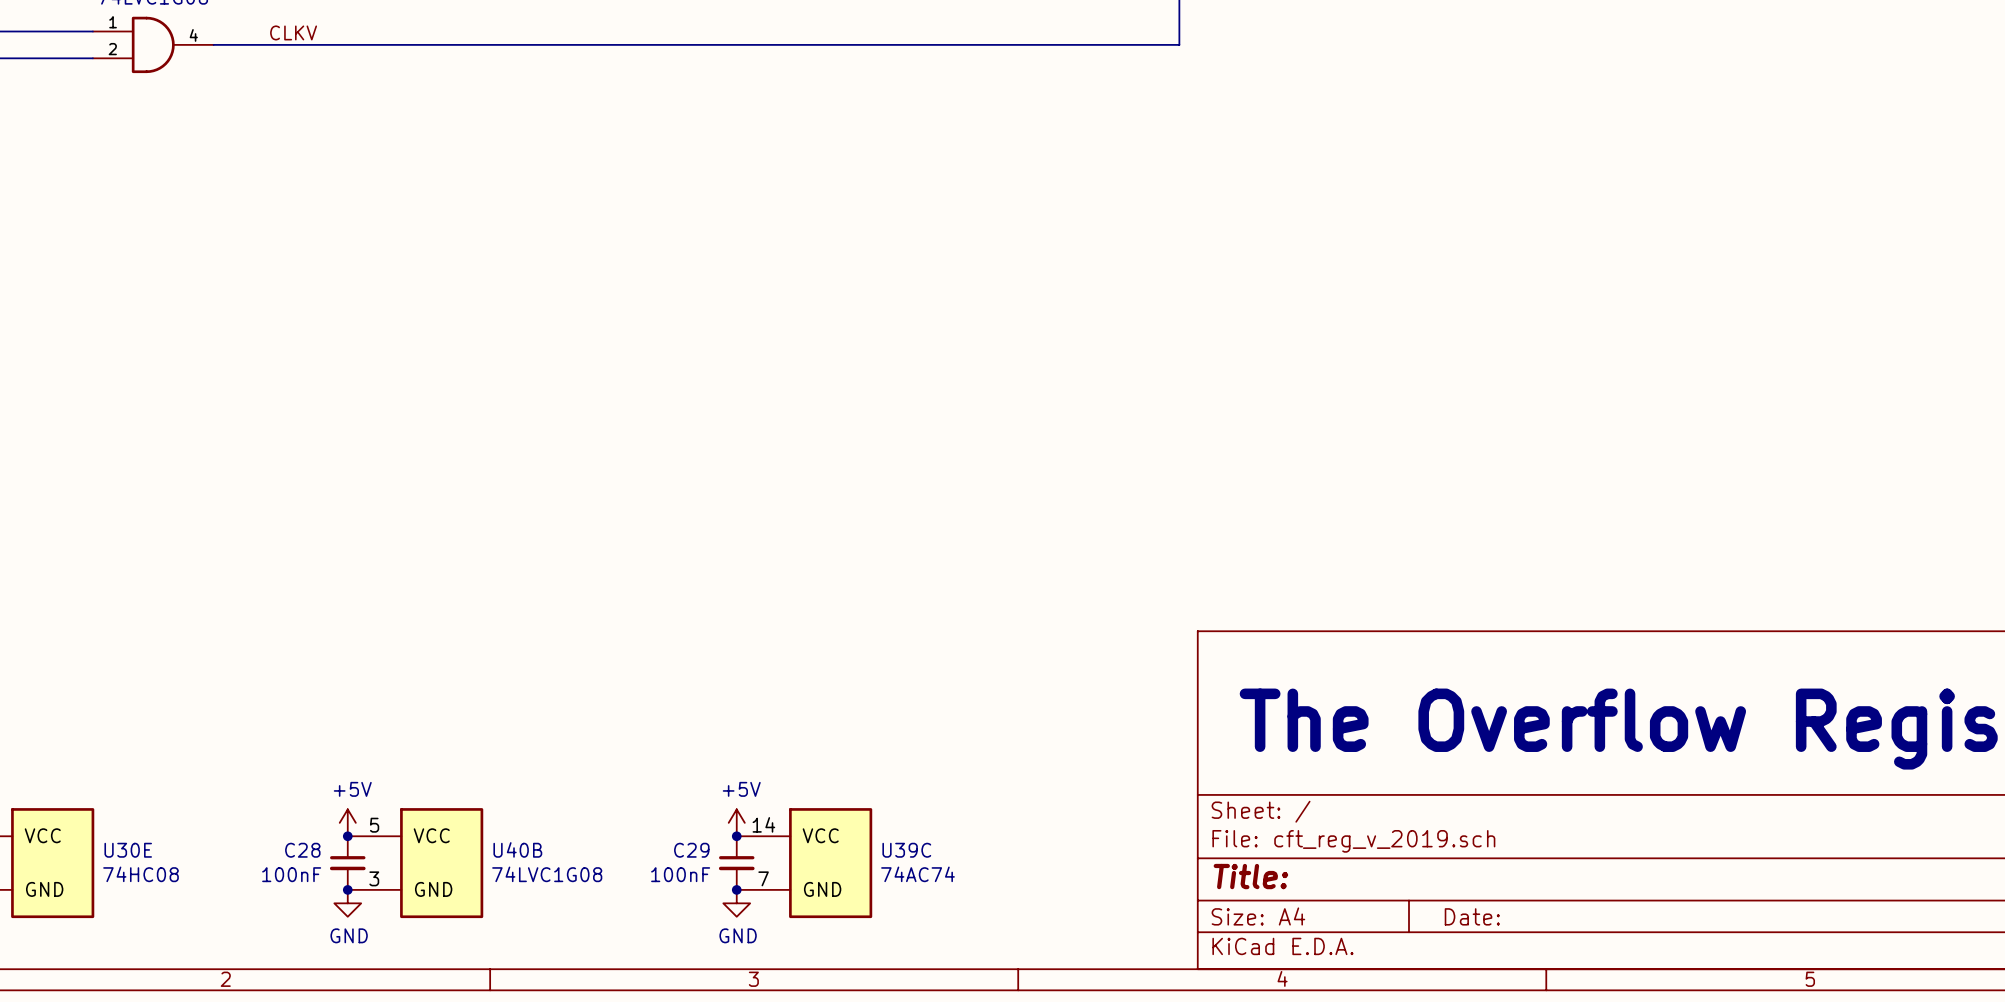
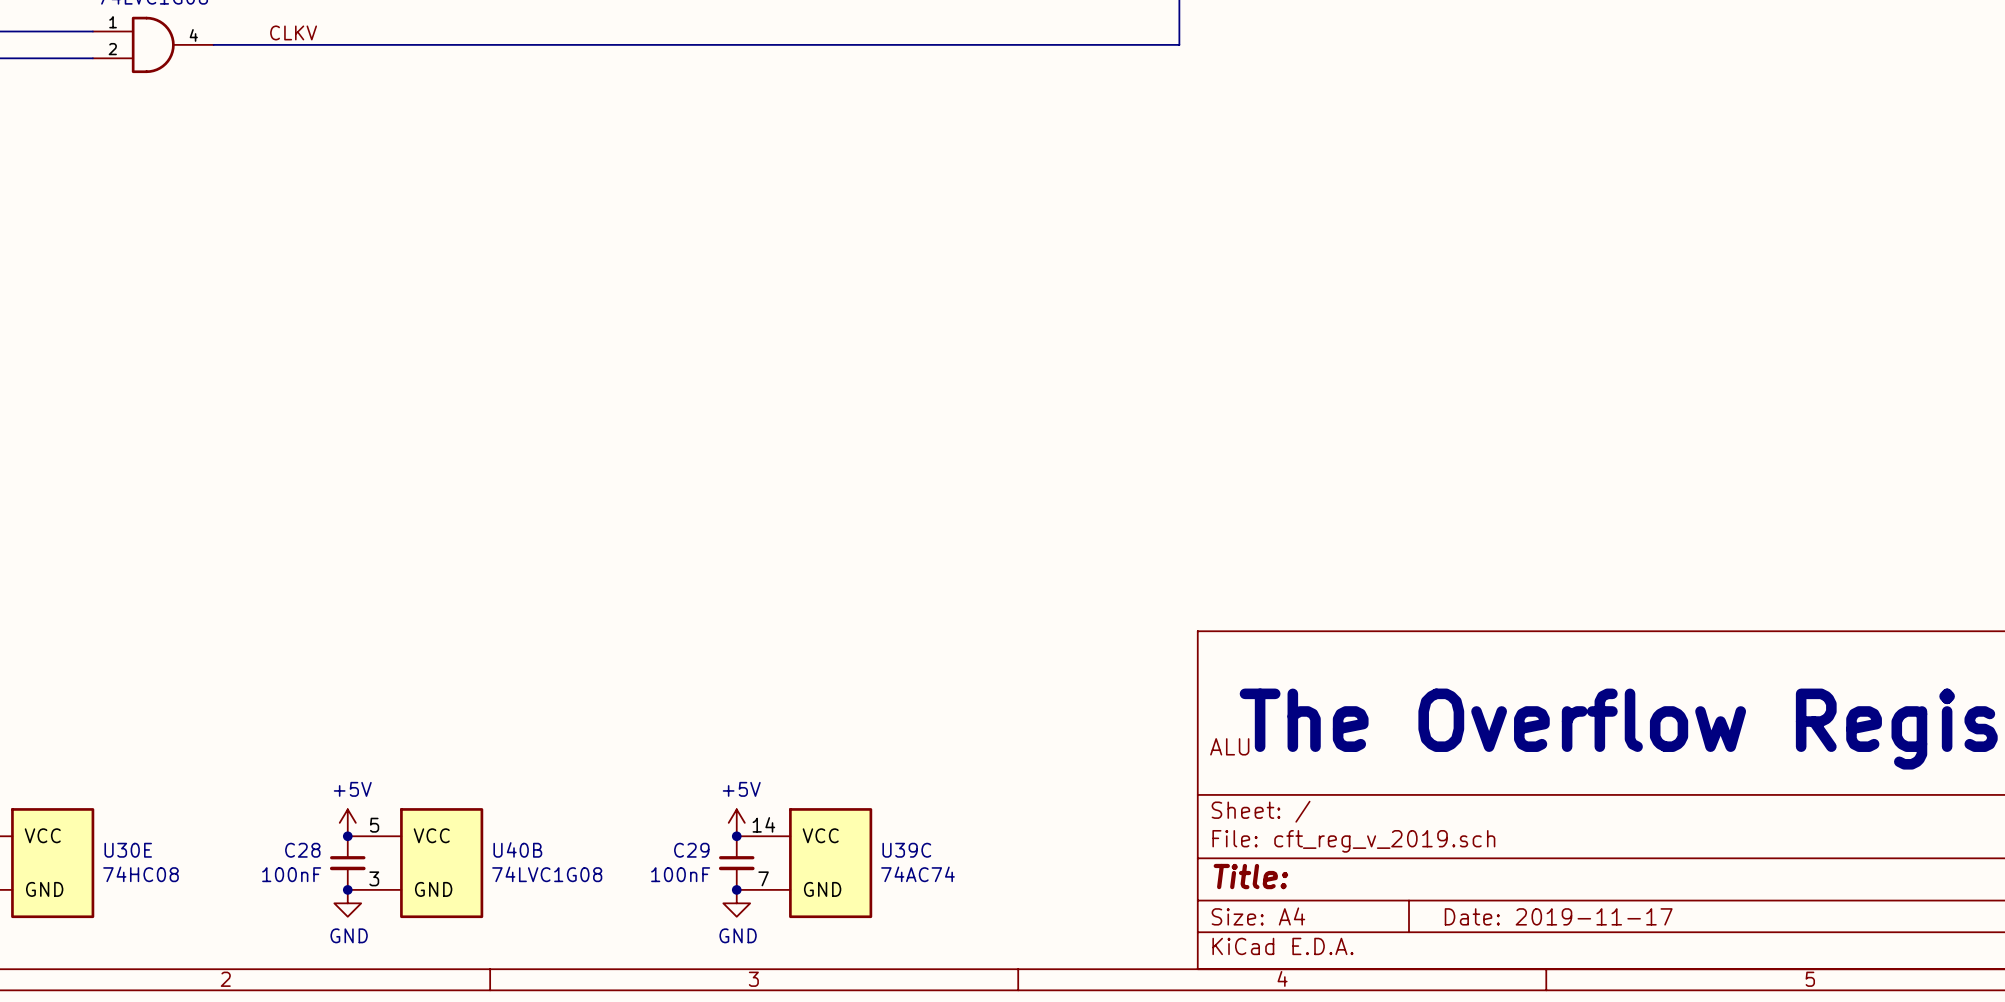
title block: none -> ALU (1229, 746)
title block: Date: (1472, 916) -> Date: 2019-11-17 (1558, 916)

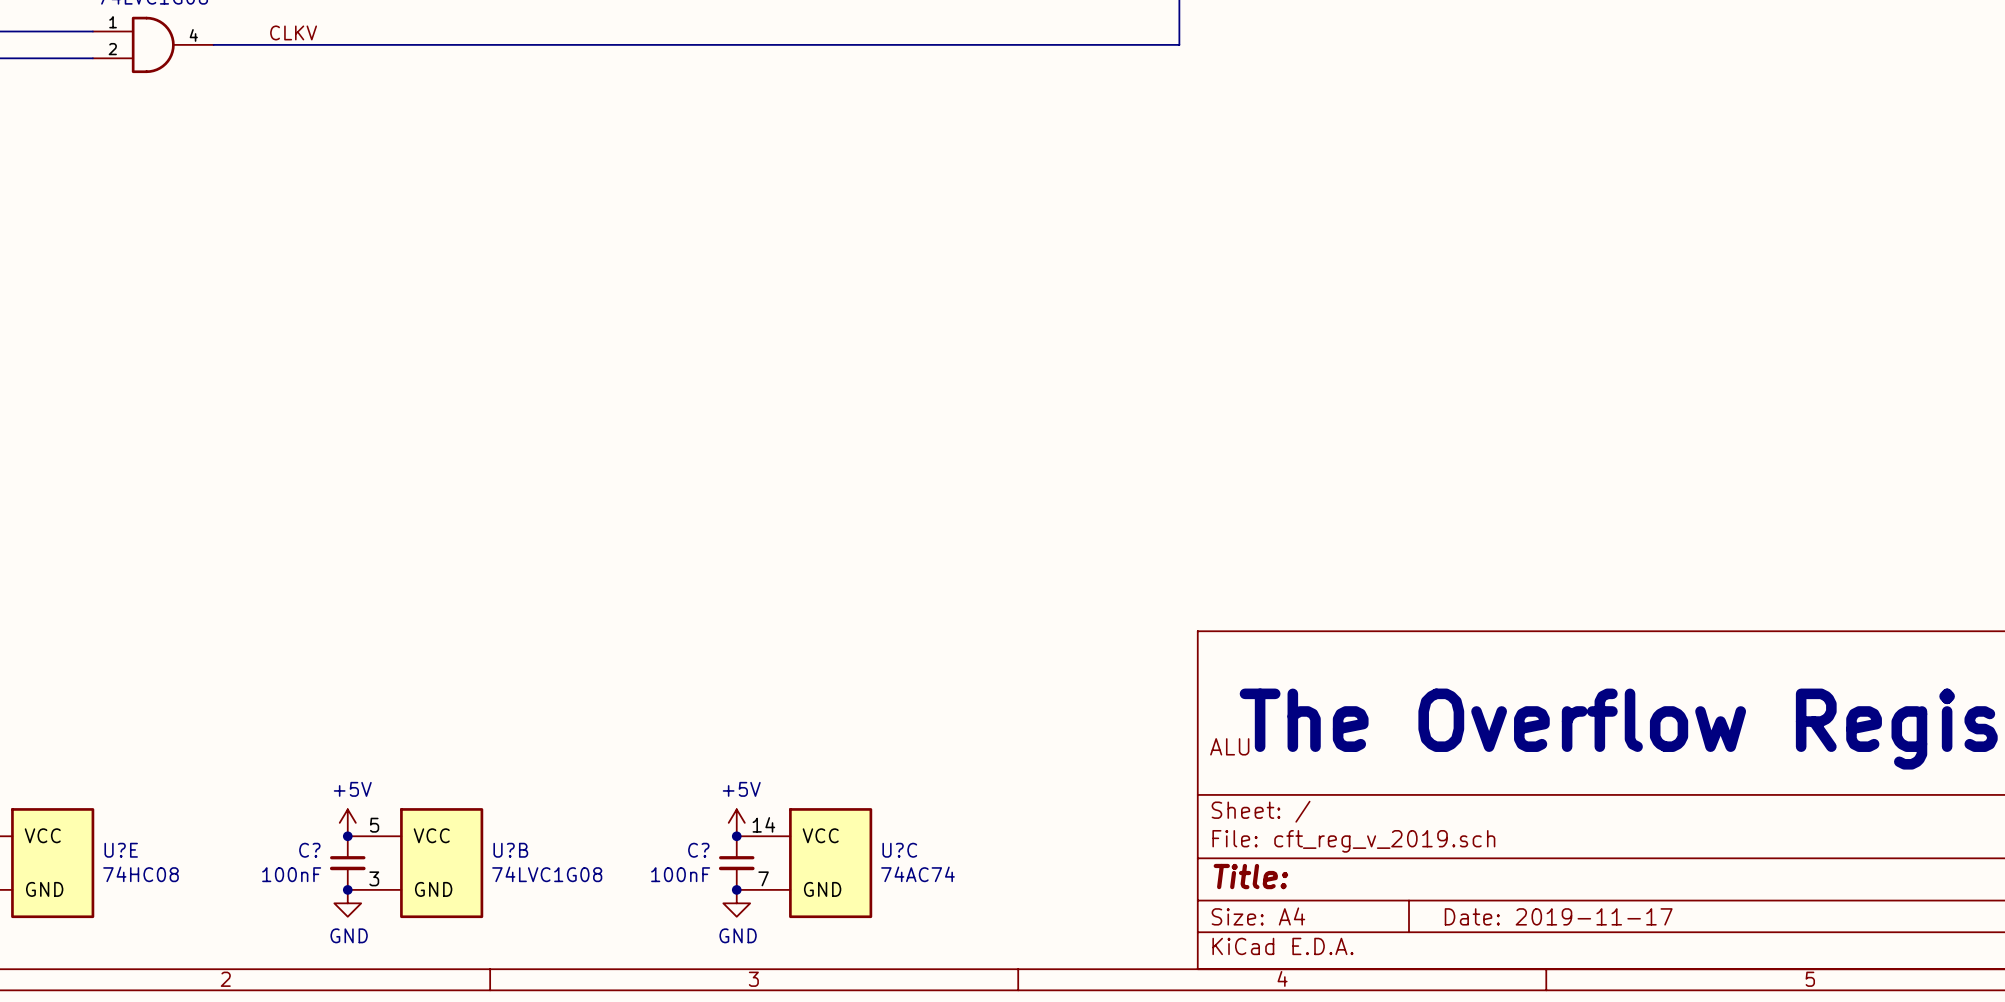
U40B name: U40B (517, 849) -> U?B (510, 850)
U30E name: U30E (128, 850) -> U?E (121, 850)
C28 name: C28 (302, 850) -> C? (309, 850)
C29 name: C29 (691, 850) -> C? (698, 850)
U39C name: U39C (906, 850) -> U?C (899, 850)

